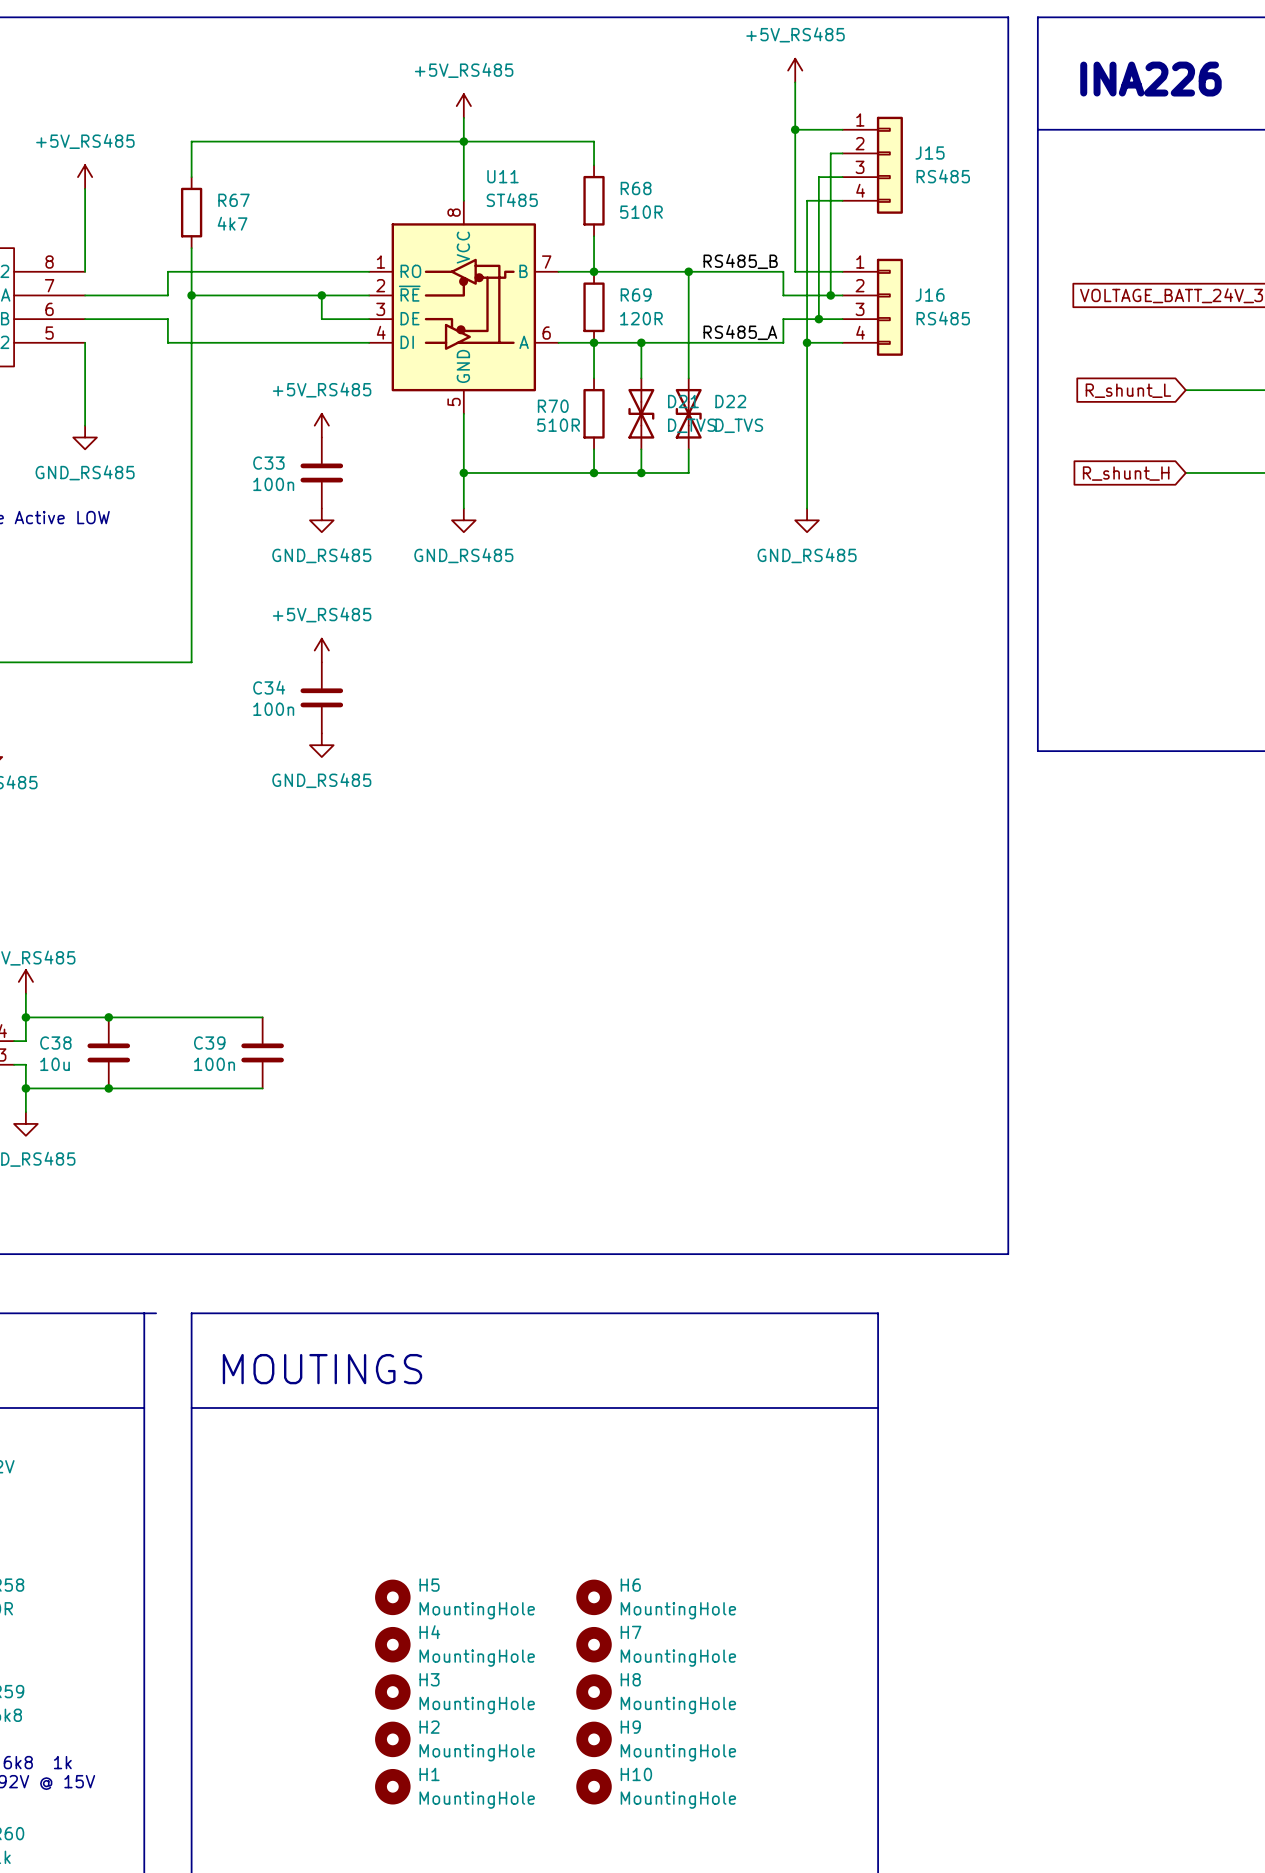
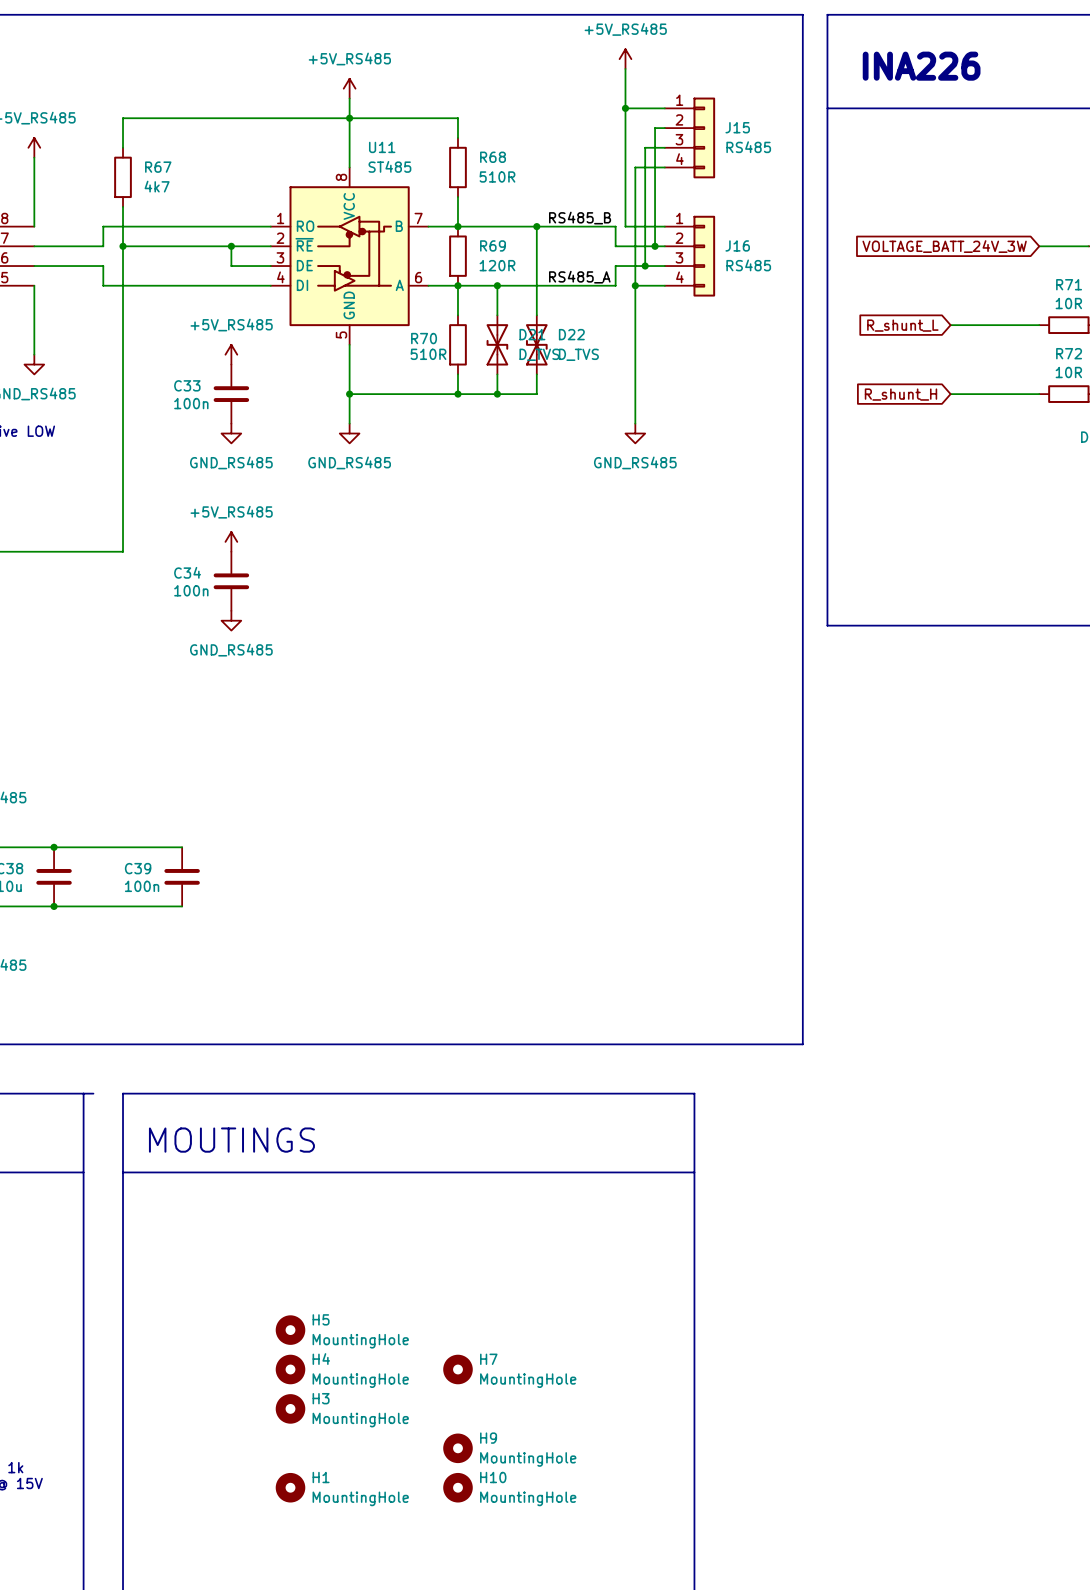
H6: MountingHole (594, 1597) -> none
H8: MountingHole (594, 1692) -> none
H2: MountingHole (392, 1739) -> none

